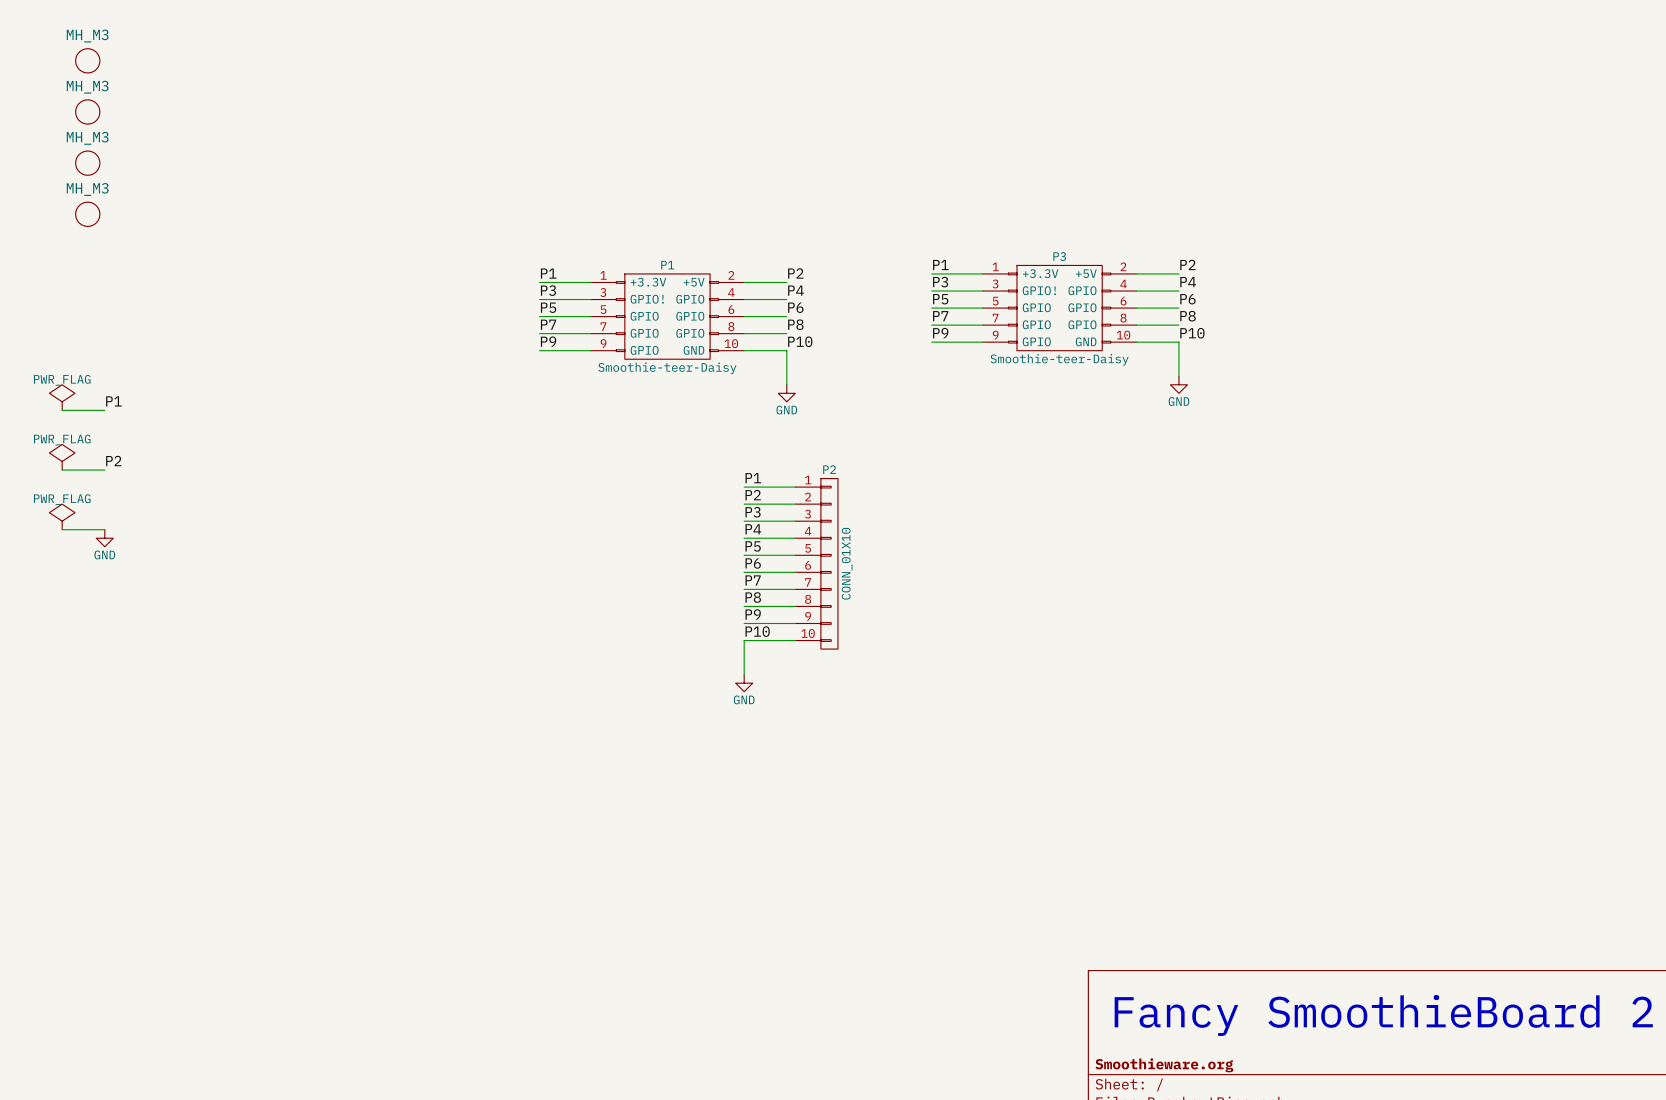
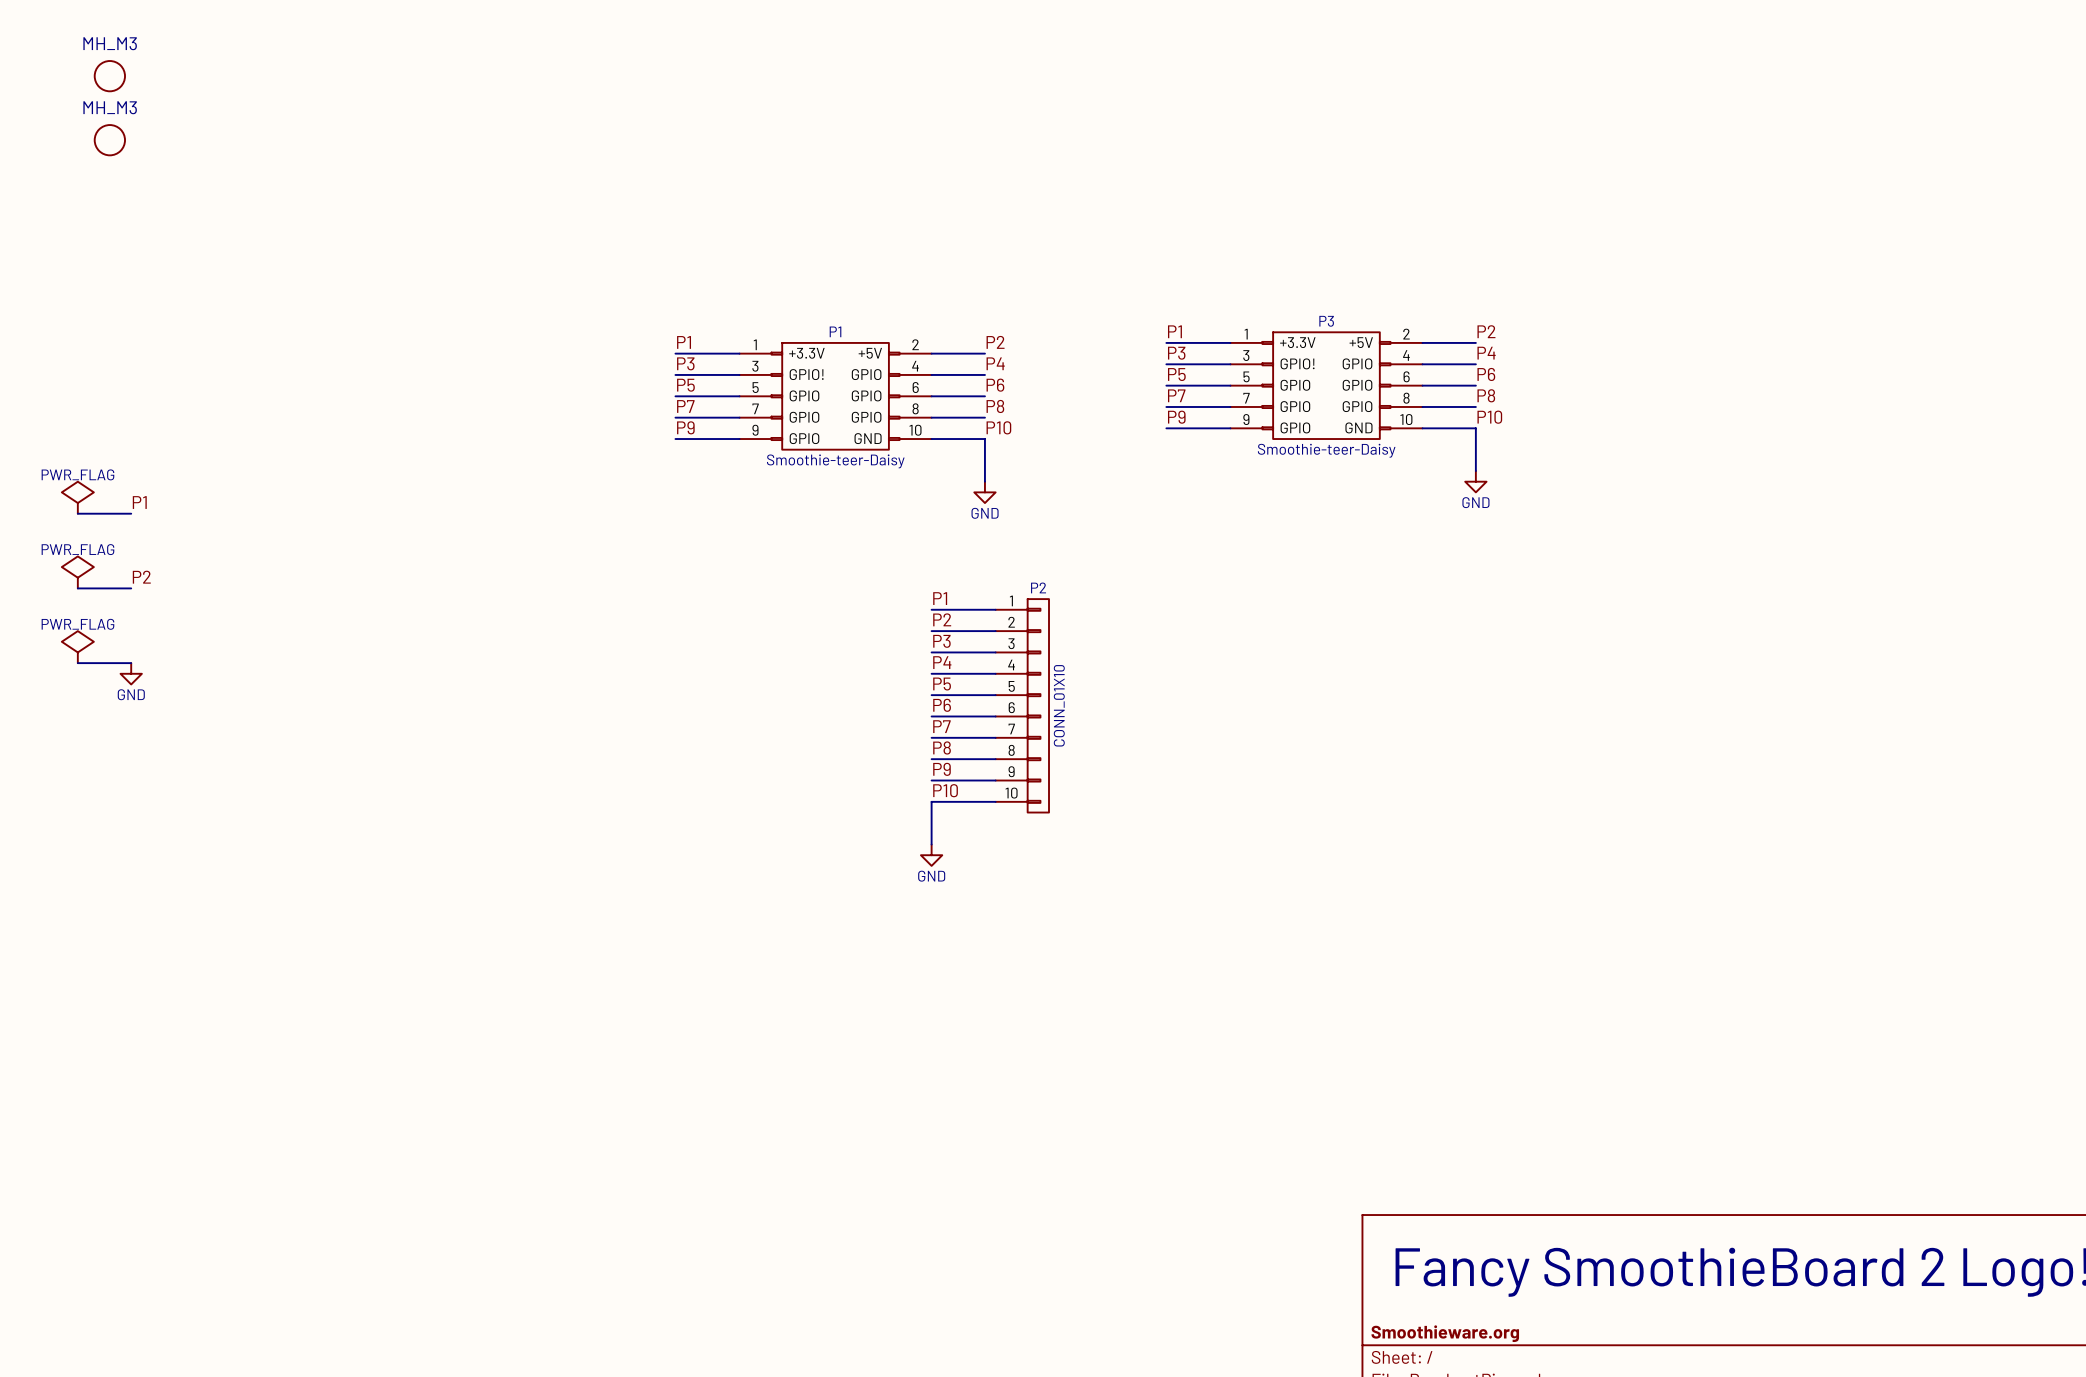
part: MH_M3 (87, 163) -> none
part: MH_M3 (87, 214) -> none

